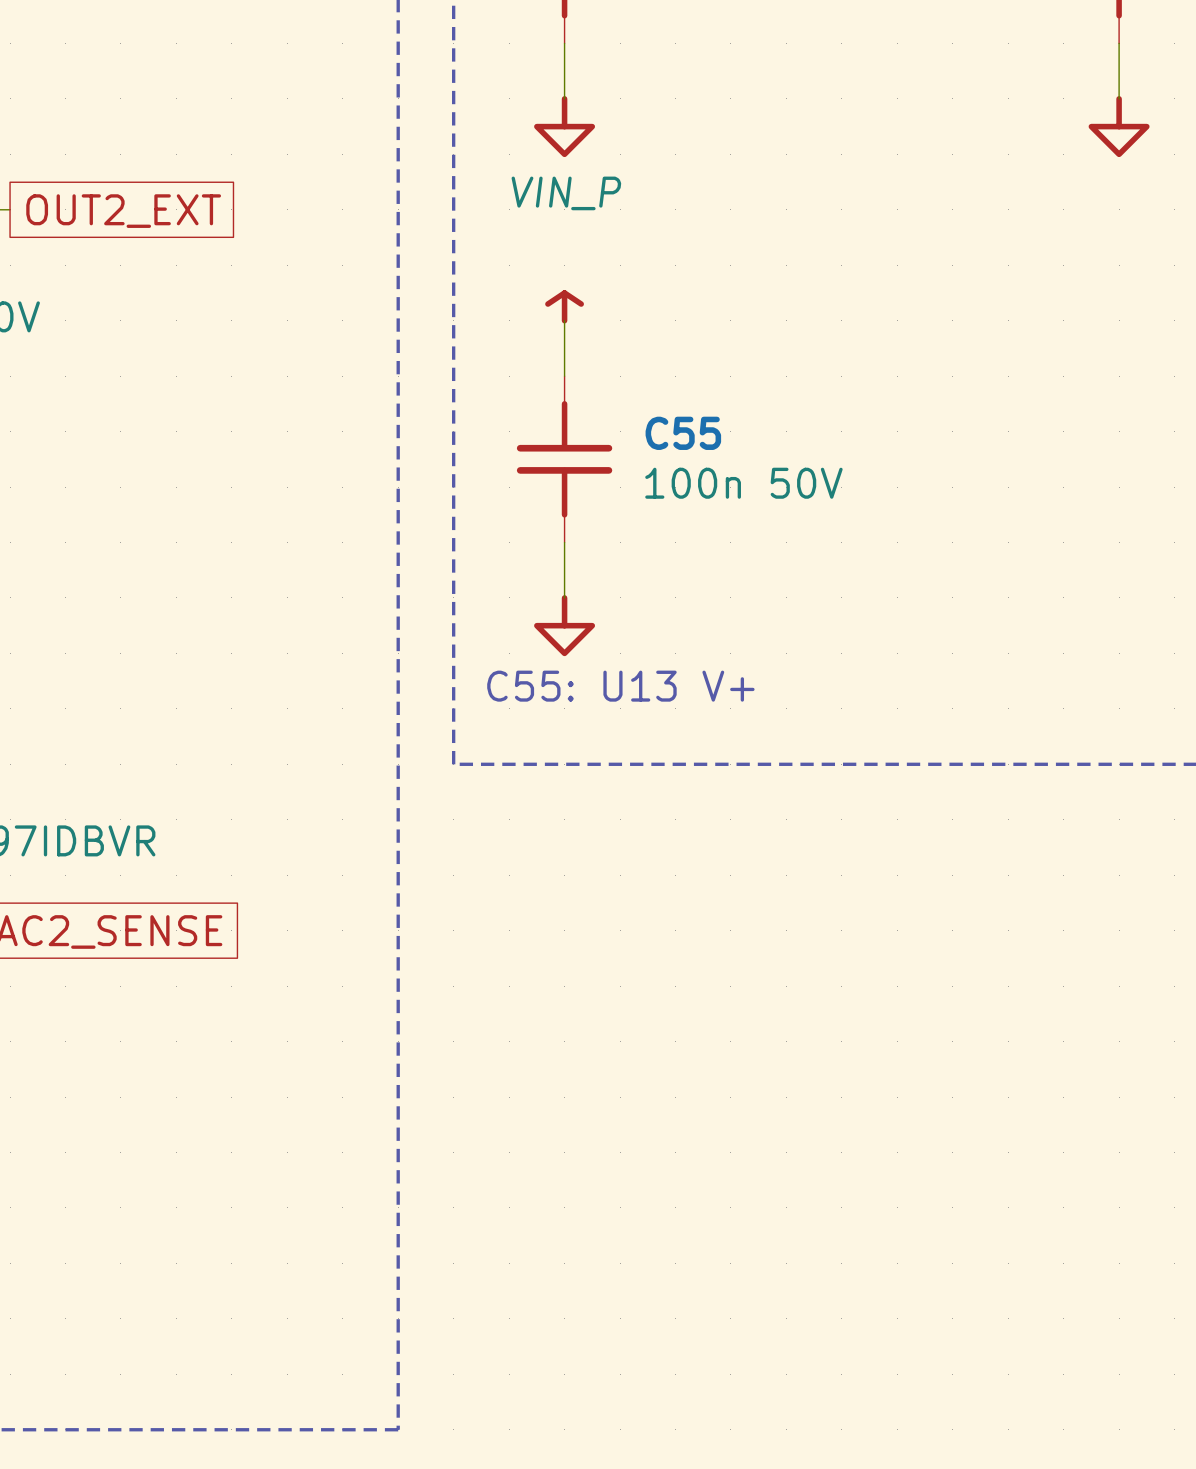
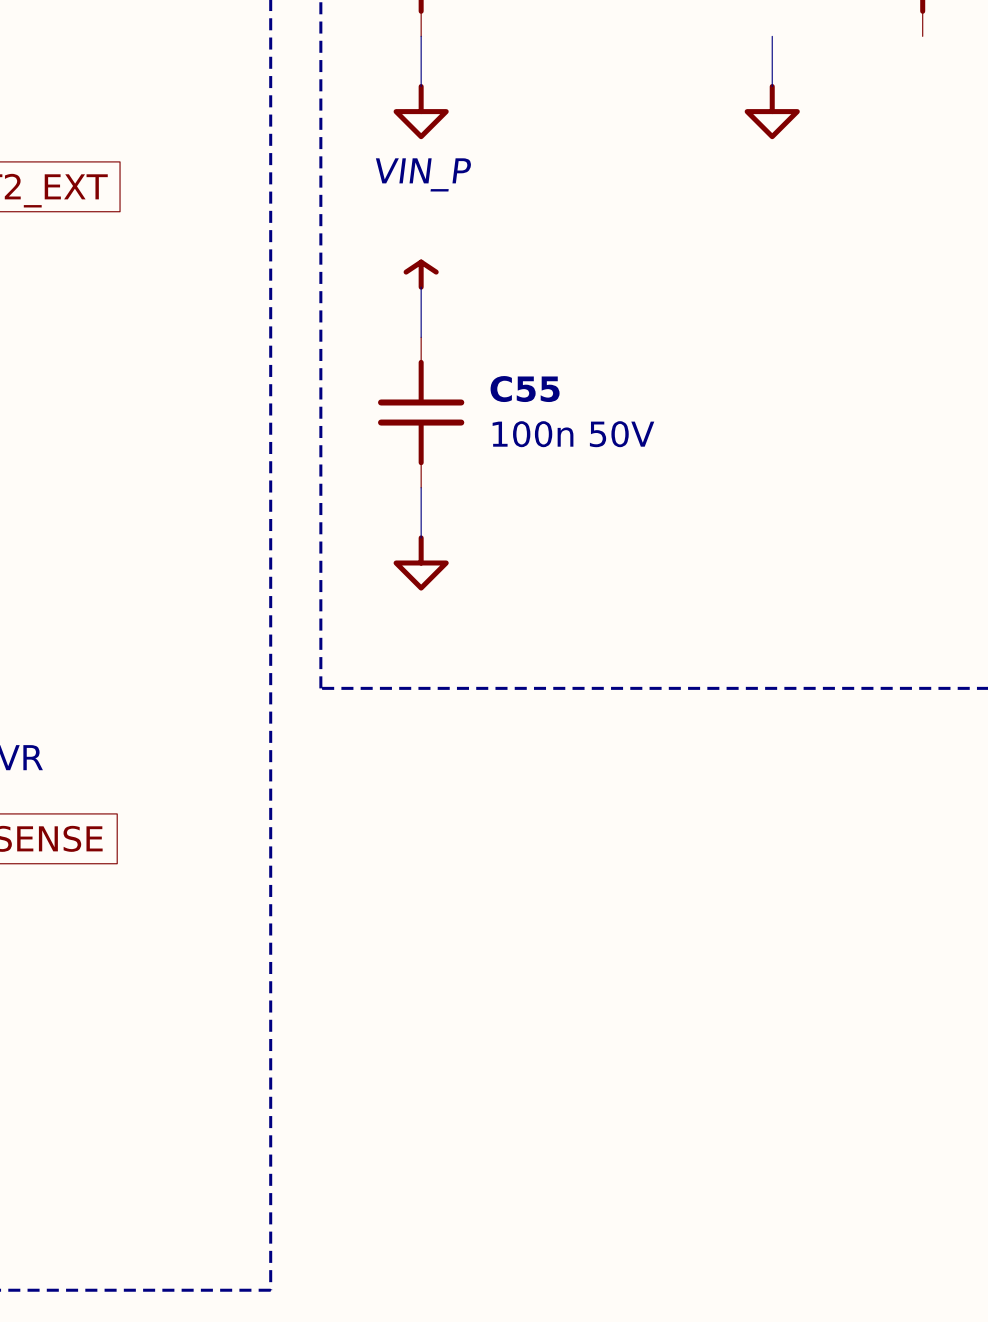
wire: (1119, 43) (1119, 98) -> (772, 36) (772, 86)
power symbol: none -> (772, 111)
power symbol: (1119, 126) -> none
text: C55: U13 V+ (620, 686) -> none

